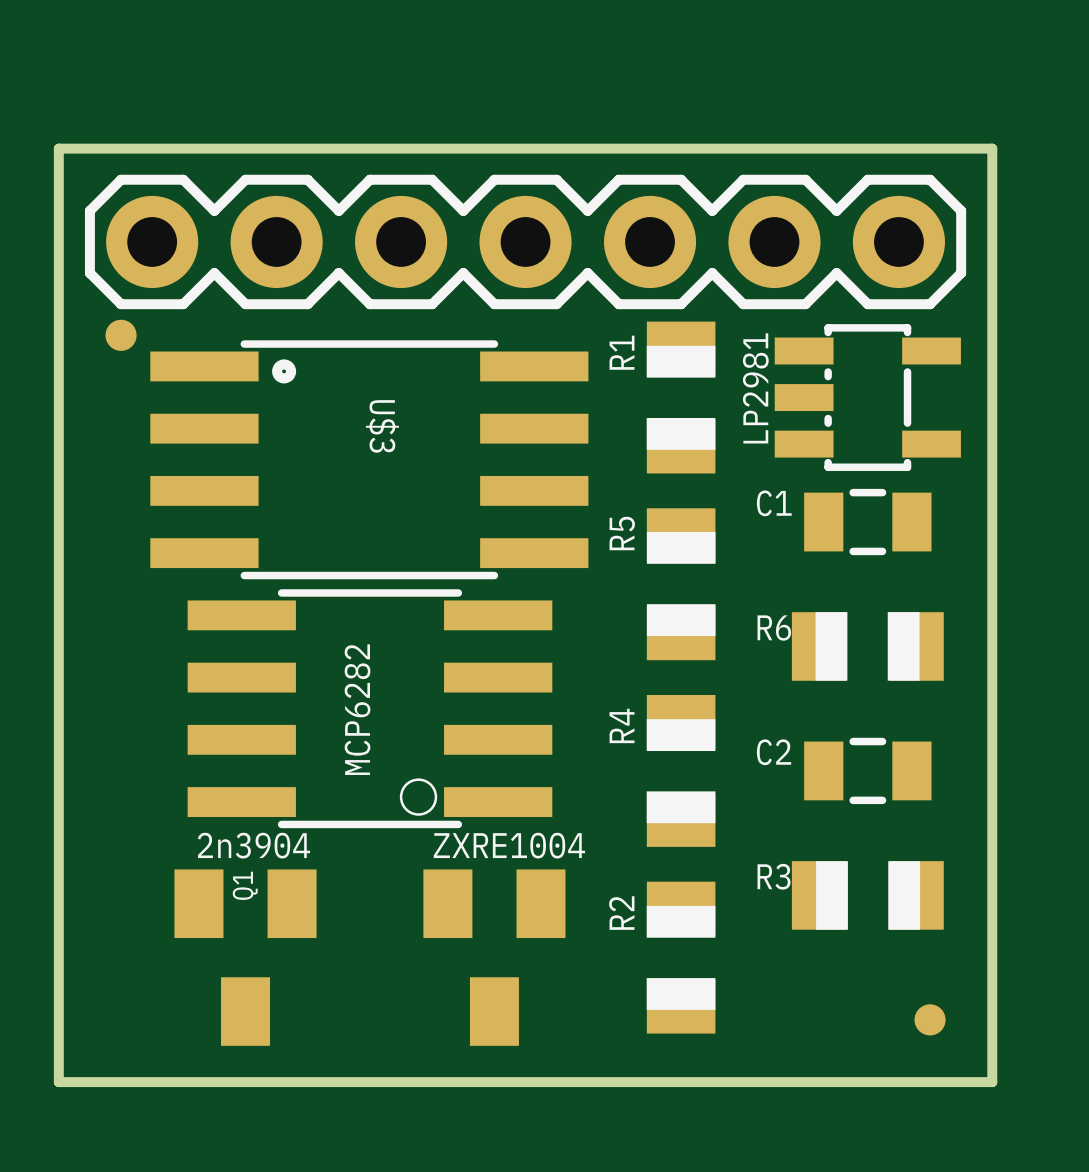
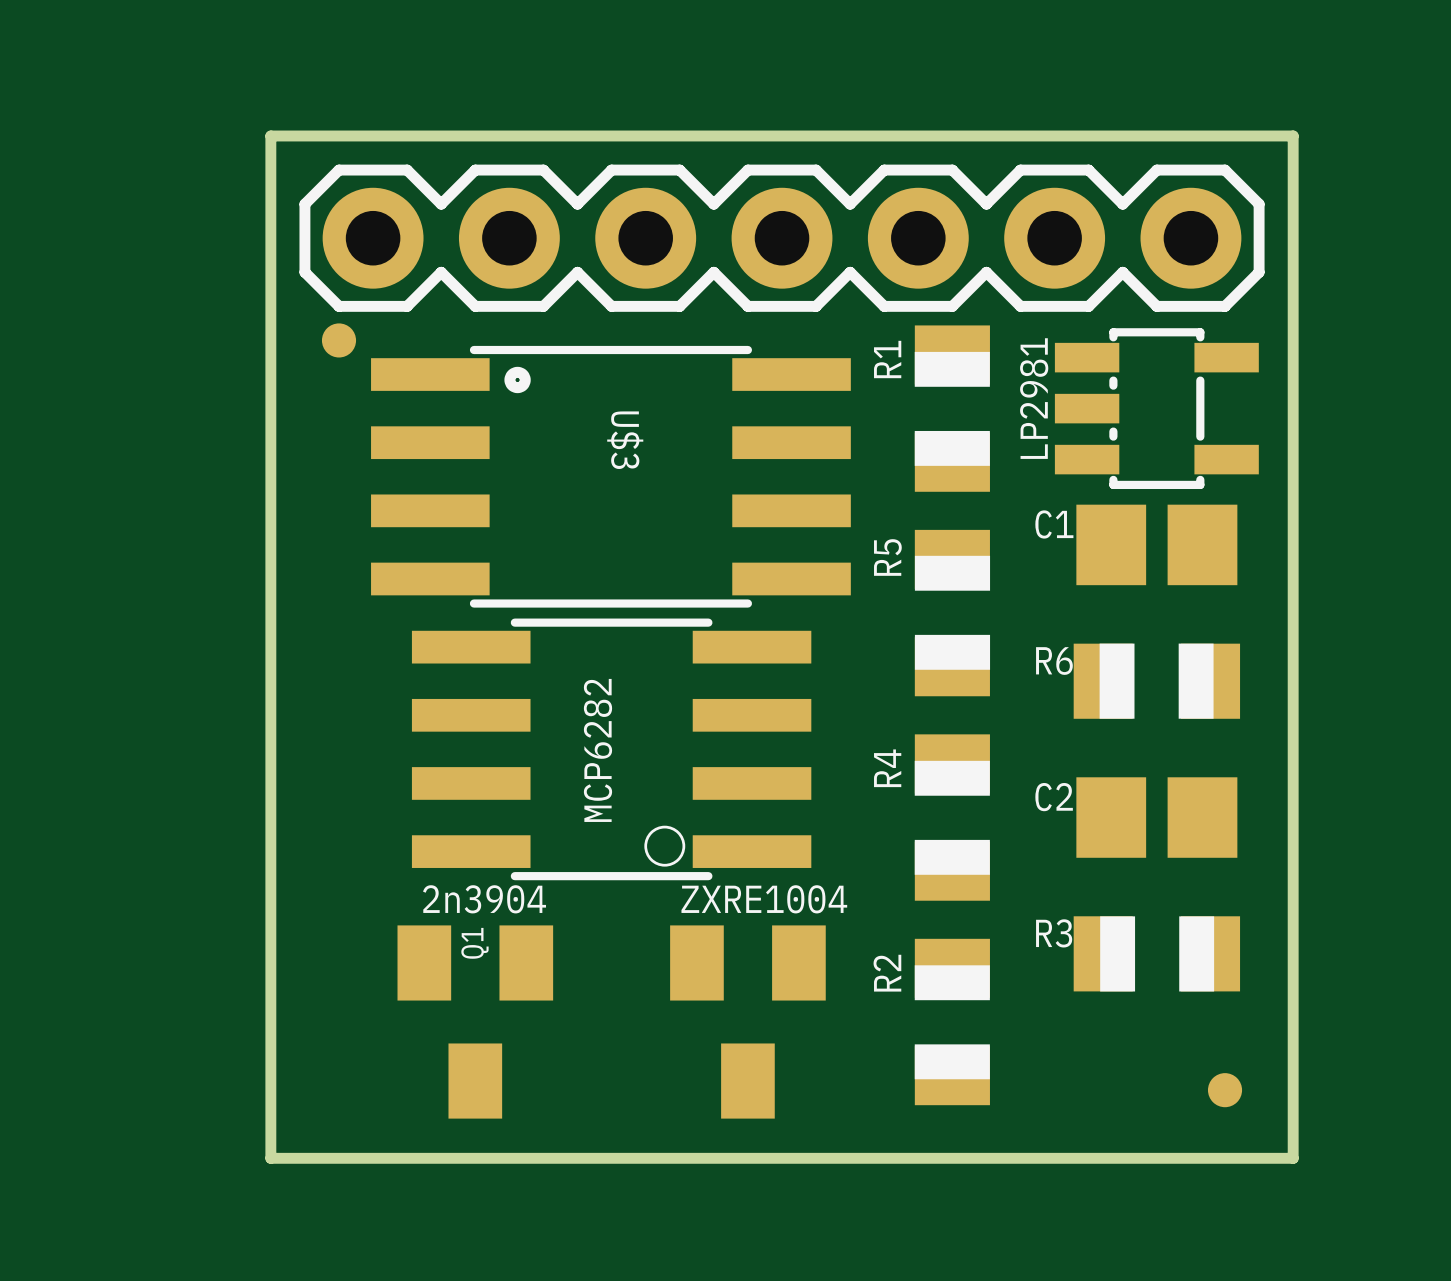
C1 footprint: [804, 488, 932, 556] -> [1076, 504, 1238, 586]
C2 footprint: [804, 737, 932, 805] -> [1076, 777, 1238, 858]

